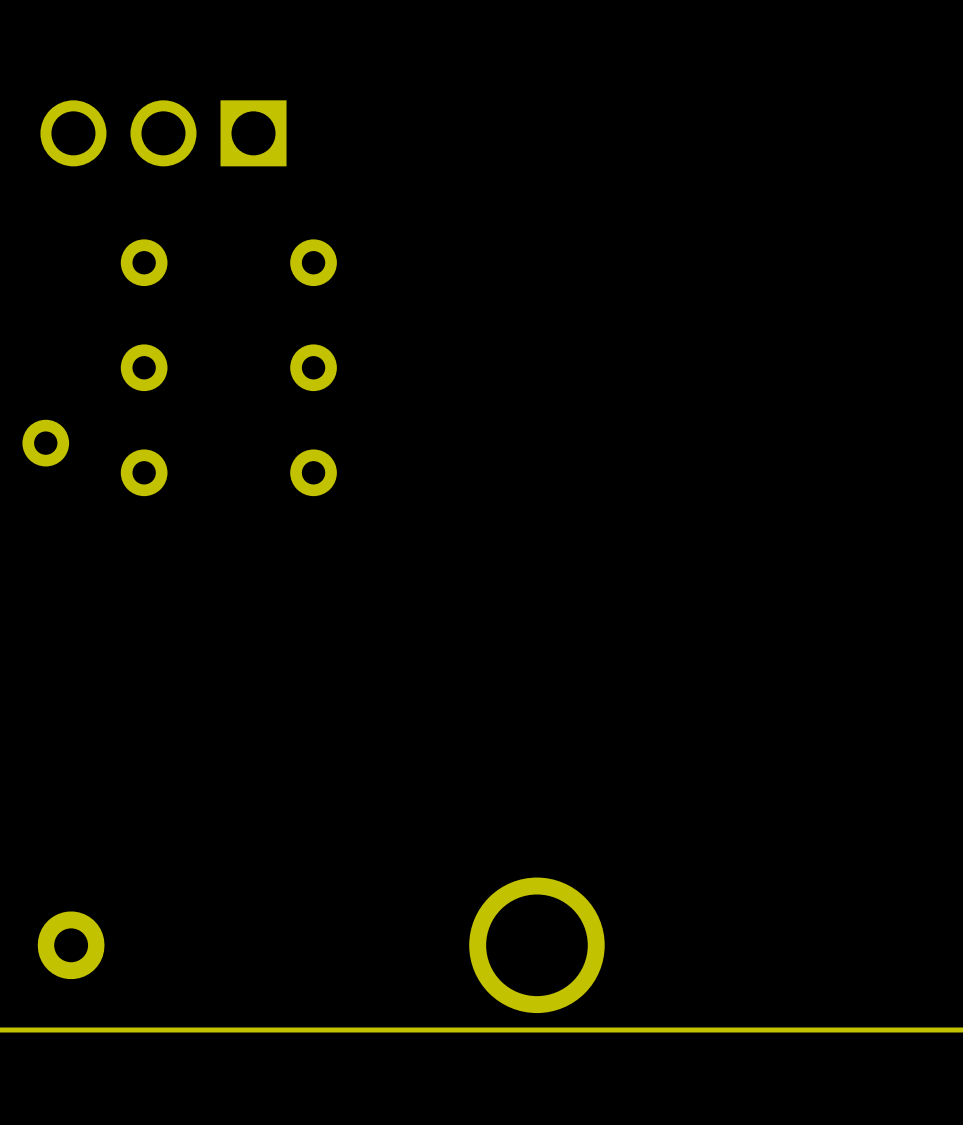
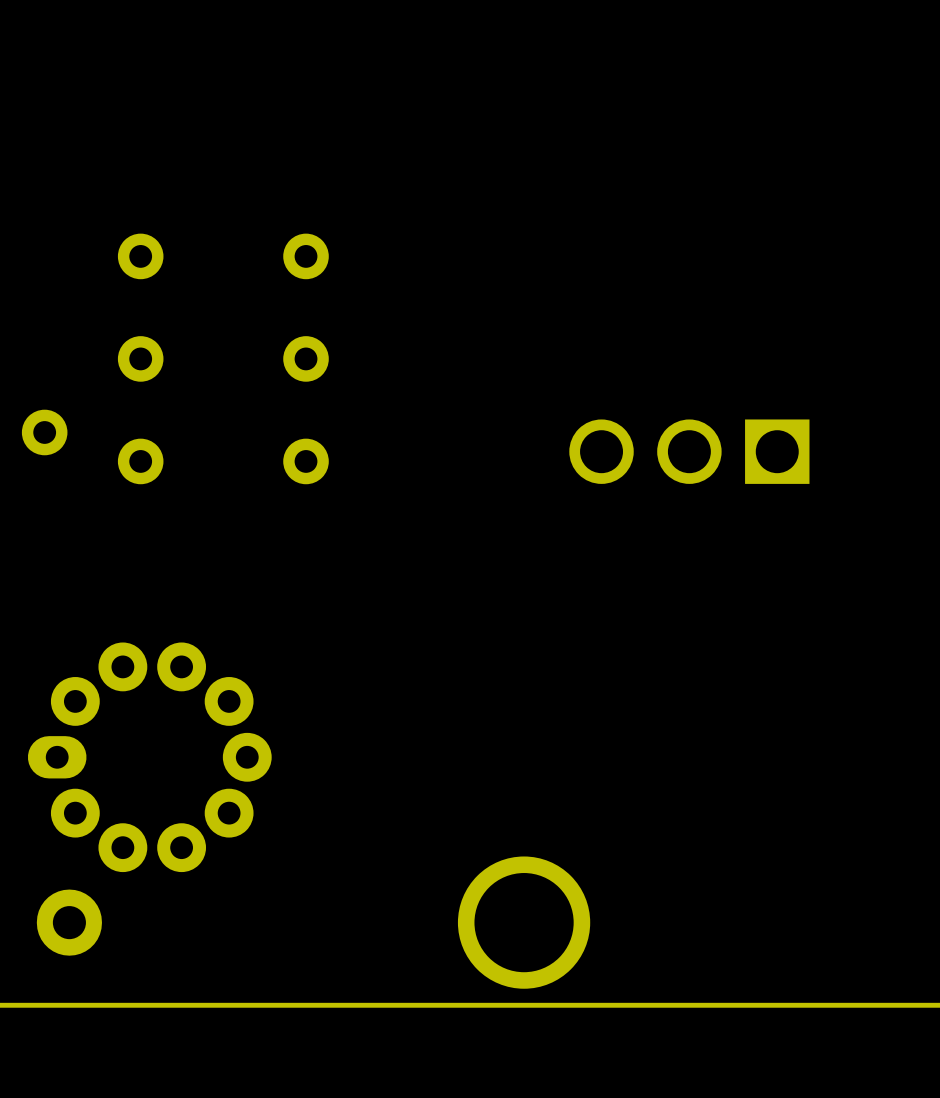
part position: (163, 133) -> (689, 451)
part: none -> (149, 757)

